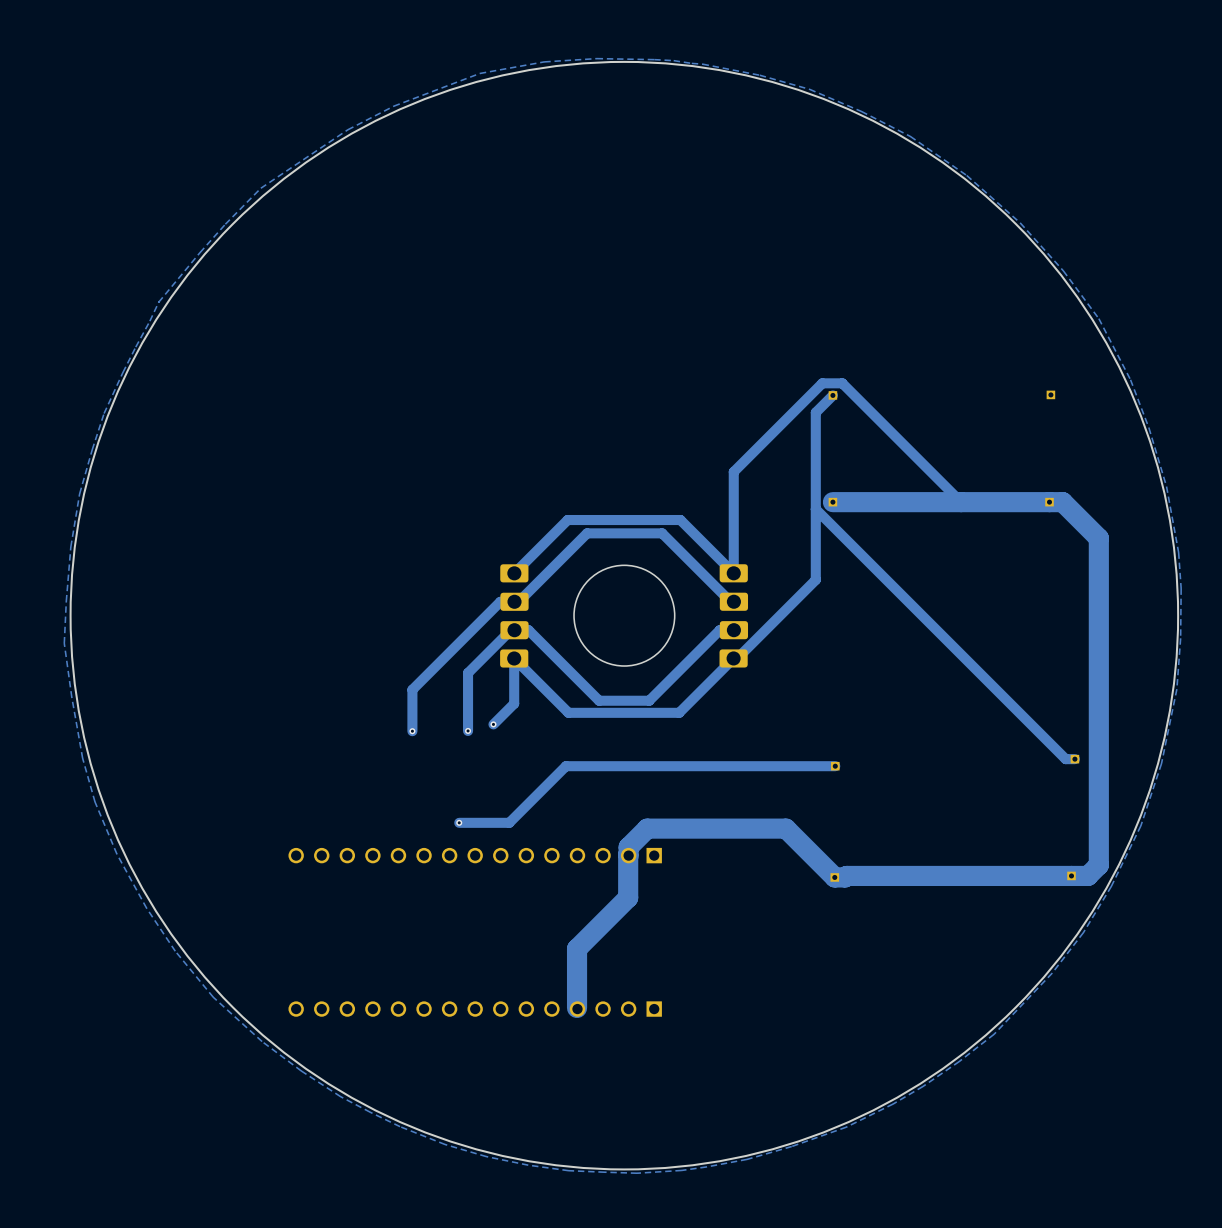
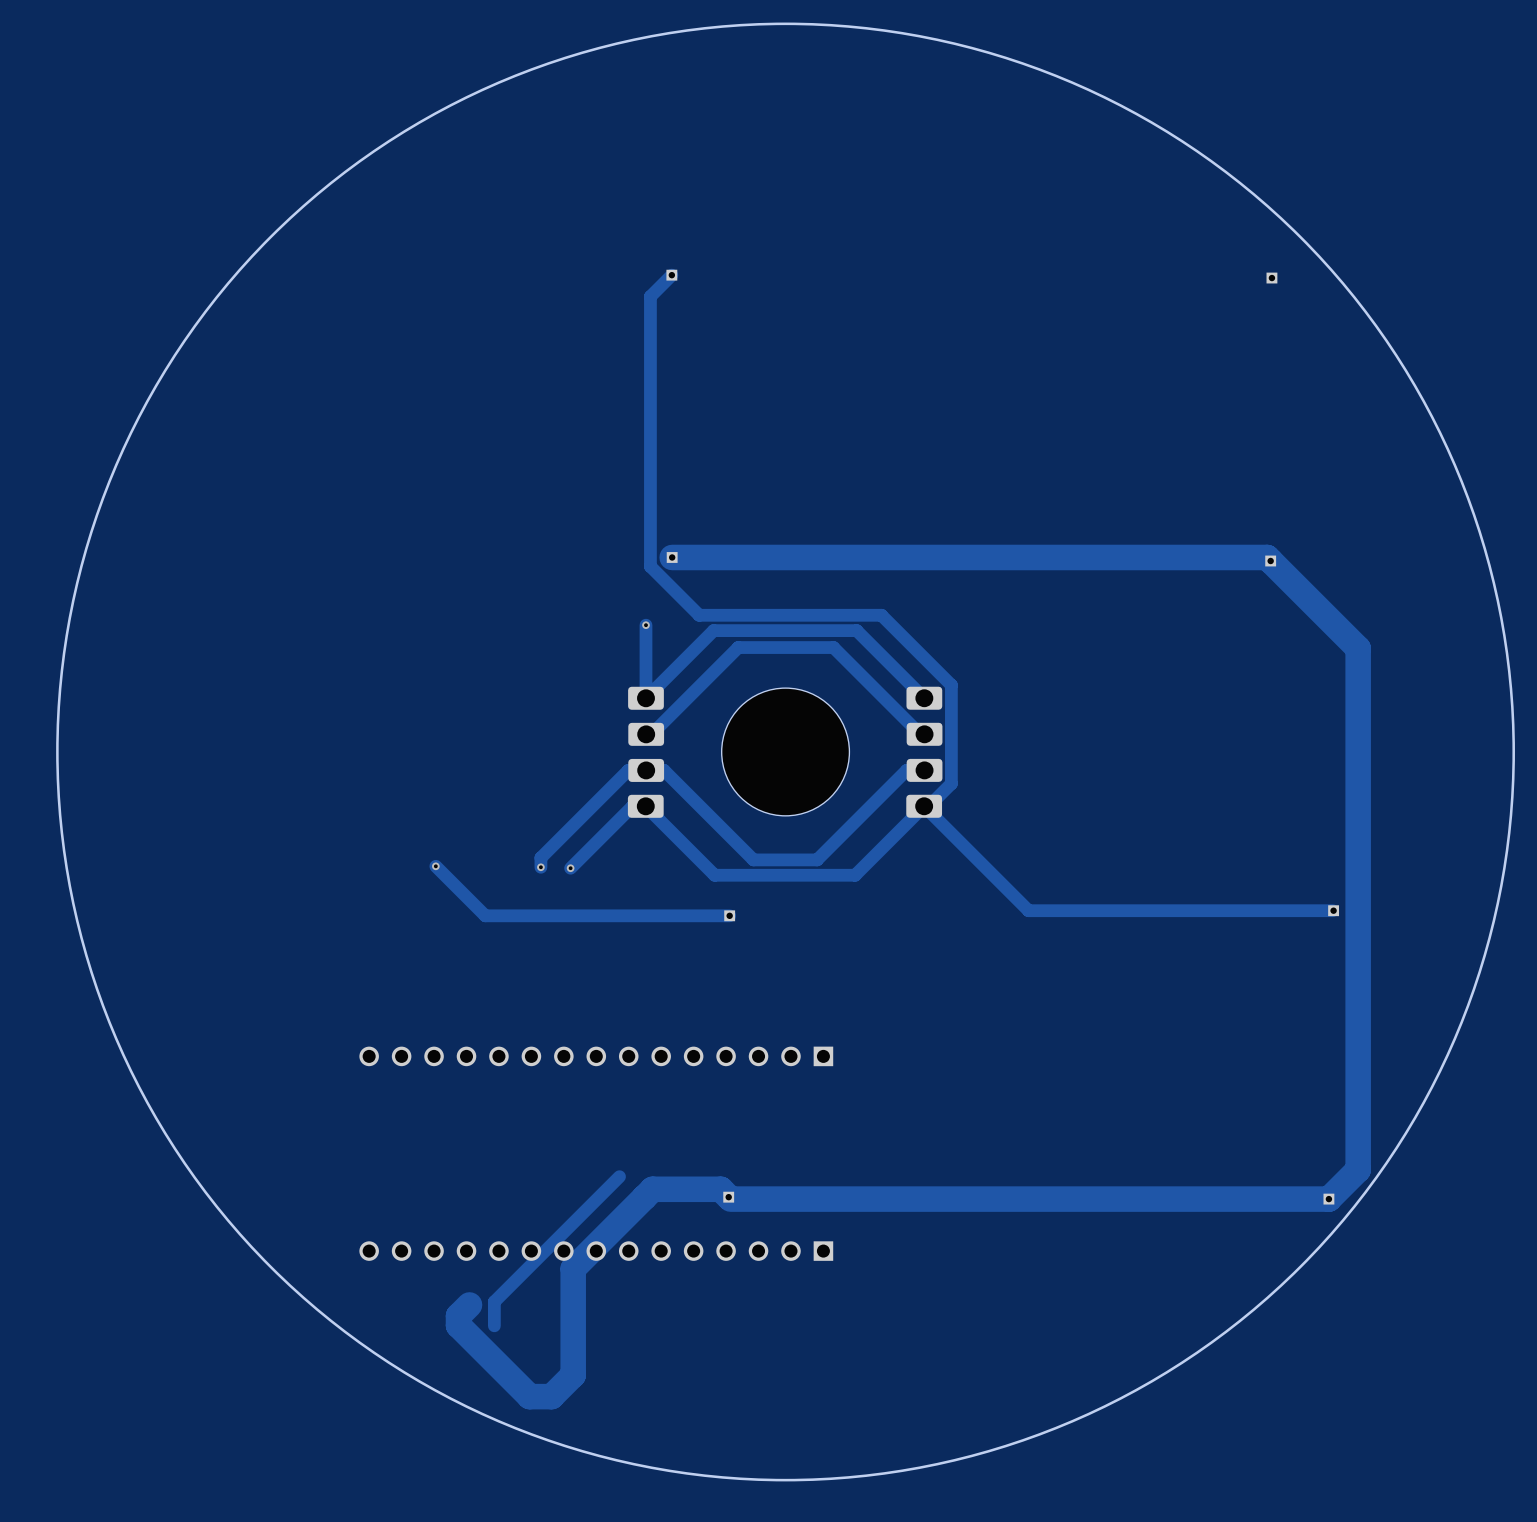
zone outline: (596, 58) (544, 61) (479, 73) (393, 106) (347, 129) (260, 188) (225, 224) (159, 301) (104, 413) (79, 493) (70, 546) (64, 643) (82, 758) (95, 801) (116, 854) (146, 908) (175, 951) (213, 997) (262, 1041) (301, 1071) (340, 1096) (400, 1126) (445, 1144) (486, 1156) (528, 1165) (568, 1170) (637, 1173) (681, 1170) (747, 1159) (791, 1146) (846, 1127) (893, 1103) (959, 1061) (994, 1034) (1052, 973) (1083, 932) (1111, 886) (1140, 825) (1161, 763) (1176, 689) (1180, 638) (1181, 588) (1178, 552) (1166, 486) (1148, 427) (1130, 379) (1098, 318) (1063, 270) (1020, 222) (966, 175) (910, 136) (861, 111) (809, 89) (759, 75) (702, 64) (673, 60) (596, 58) -> none
round board edge size: [69, 60, 1180, 1171] -> [56, 22, 1515, 1482]
part: none -> (671, 275)
part: none -> (1271, 278)
part: (1050, 394) -> none
track: (832, 395) (815, 412) (815, 579) (755, 640) -> (671, 275) (650, 296) (650, 566) (699, 615) (881, 615) (951, 685) (951, 783)
part: (832, 395) -> none
track: none -> (672, 557) (1267, 557) (1358, 648) (1358, 1169) (1328, 1199) (730, 1199)
part: none -> (672, 557)
part: none -> (1270, 560)
track: (832, 502) (1062, 502) (1098, 538) (1098, 865) (1088, 875) (834, 877) (785, 828) (647, 828) (628, 847) (628, 855) -> none
part: (832, 502) -> none
track: (961, 502) (842, 383) (822, 383) (733, 471) (733, 573) -> none
part: (1049, 502) -> none
track: (815, 509) (1065, 759) (1074, 759) -> none
track: none -> (645, 625) (645, 698)
via: none -> (645, 625)
track: (514, 601) (500, 601) (412, 689) (412, 731) -> none
track: (510, 630) (468, 673) (468, 730) -> (641, 770) (628, 770) (540, 857) (540, 867)
track: (514, 658) (514, 703) (493, 724) -> (645, 806) (632, 806) (570, 868)
track: none -> (924, 806) (1028, 910) (1332, 910)
track: none -> (435, 866) (485, 915) (729, 915)
via: none -> (435, 866)
via: none -> (540, 867)
via: none -> (570, 868)
via: (493, 724) -> none
via: (468, 730) -> none
via: (412, 731) -> none
part: none -> (729, 915)
part position: (1074, 759) -> (1333, 910)
track: (835, 766) (565, 766) (509, 822) (459, 822) -> none
part: (835, 766) -> none
via: (459, 822) -> none
track: (628, 854) (628, 897) (577, 948) (577, 1007) -> none
part: (1071, 875) -> none
part: (834, 877) -> none
track: none -> (619, 1176) (494, 1301) (494, 1325)
track: none -> (728, 1197) (720, 1189) (652, 1189) (573, 1268) (573, 1375) (551, 1396) (529, 1396) (458, 1325) (458, 1315) (469, 1304)
part: none -> (728, 1197)
part: none -> (1328, 1199)

